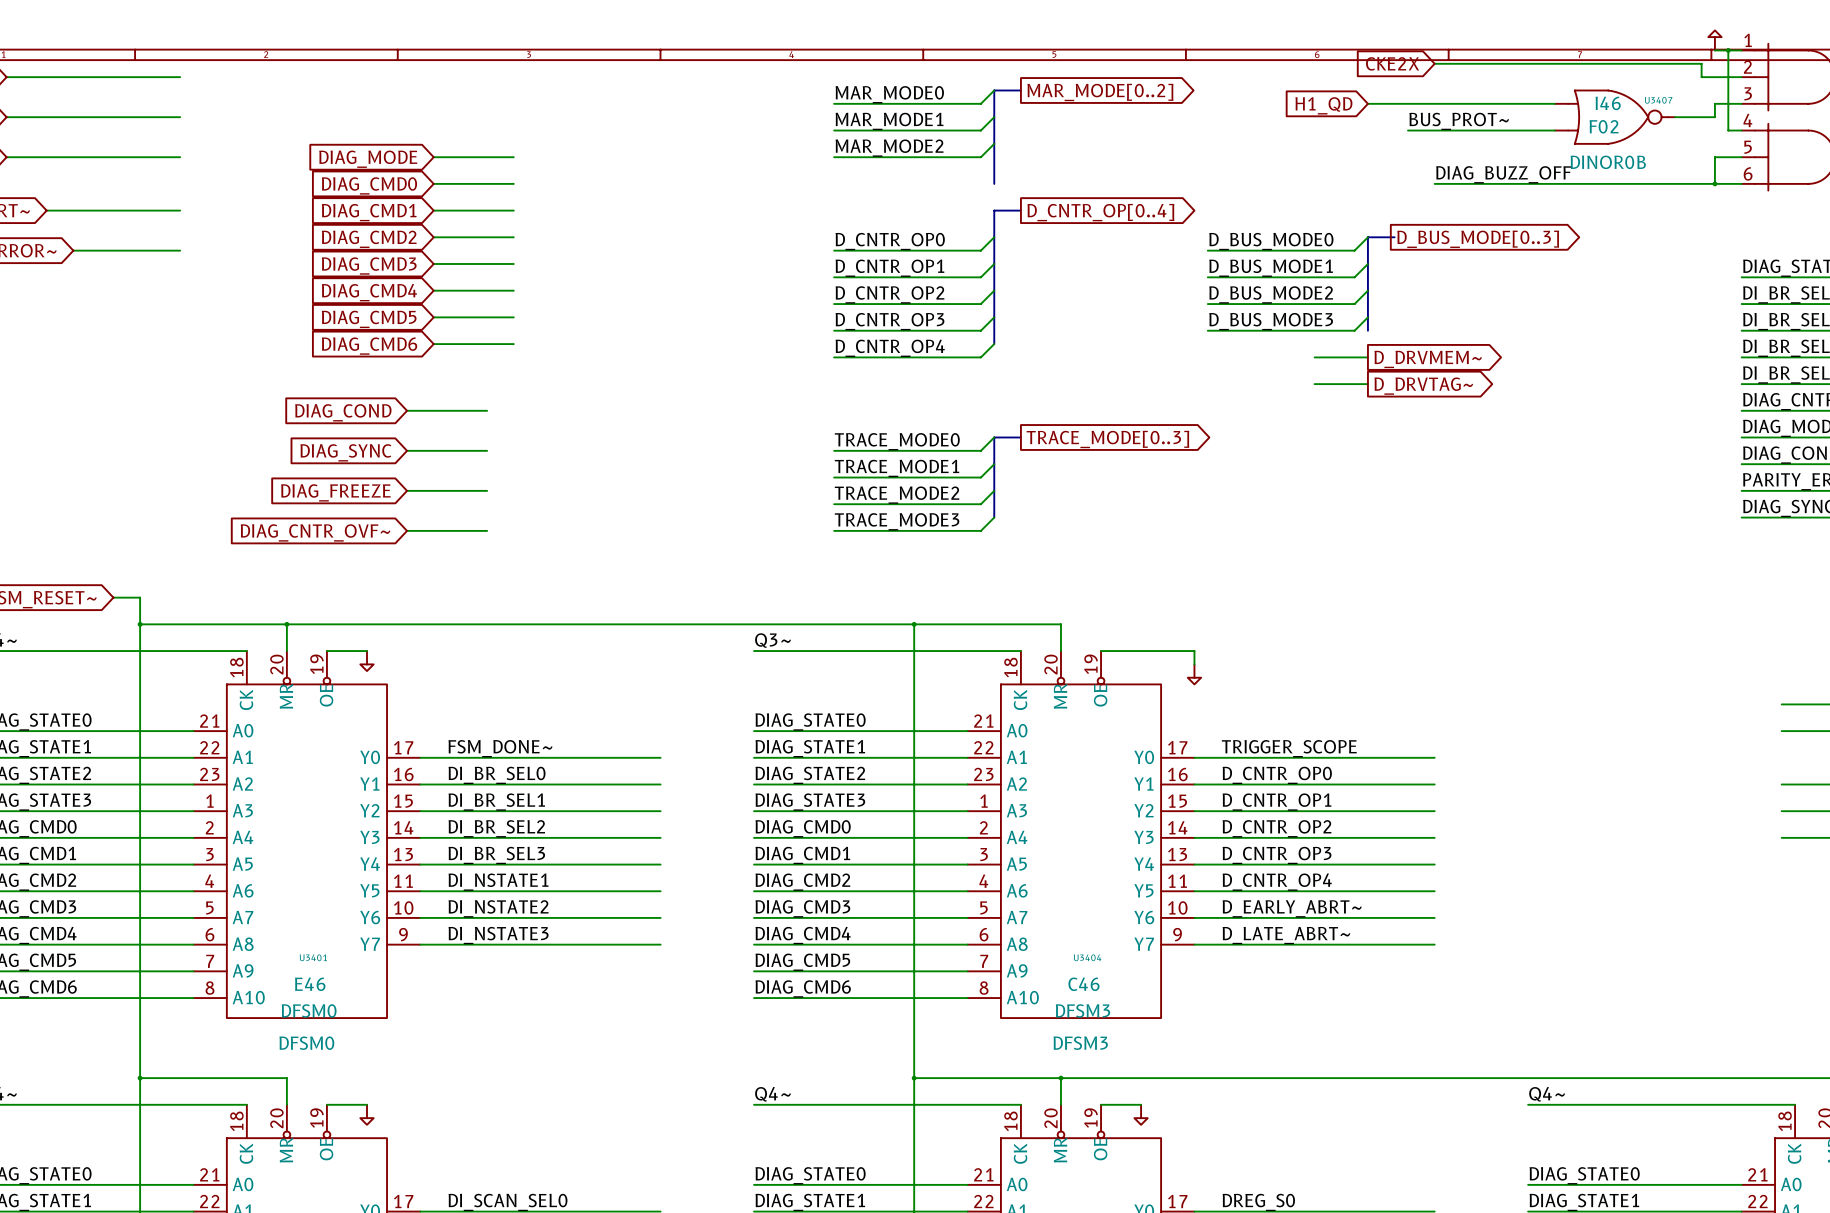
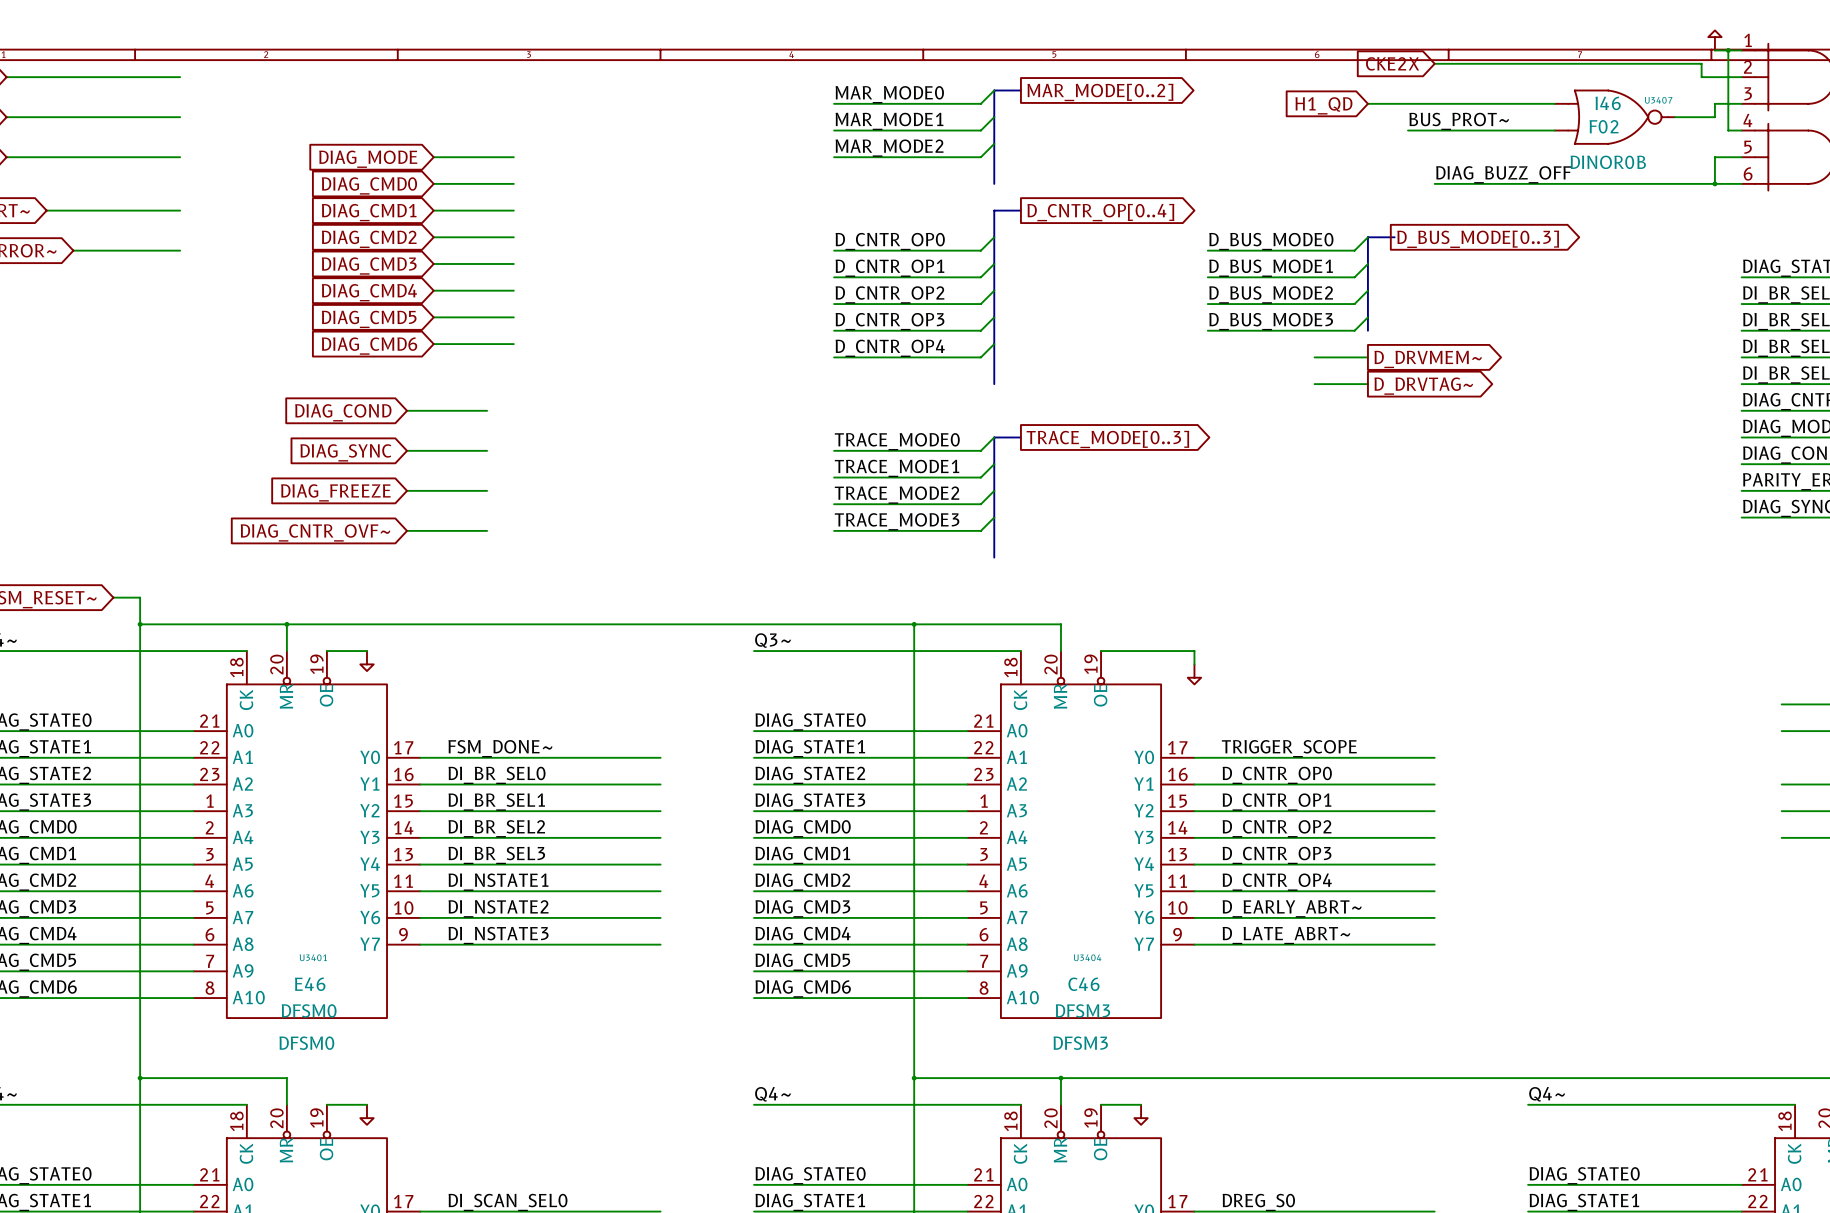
bus: none -> (994, 344) (994, 384)
bus: none -> (994, 517) (994, 557)

